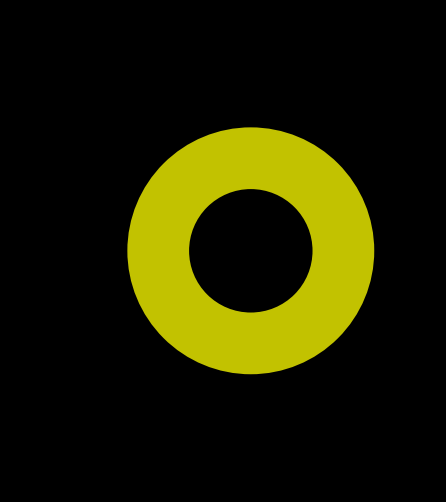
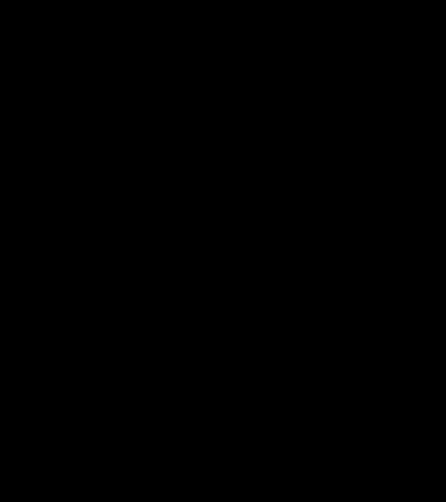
part: (250, 250) -> none

